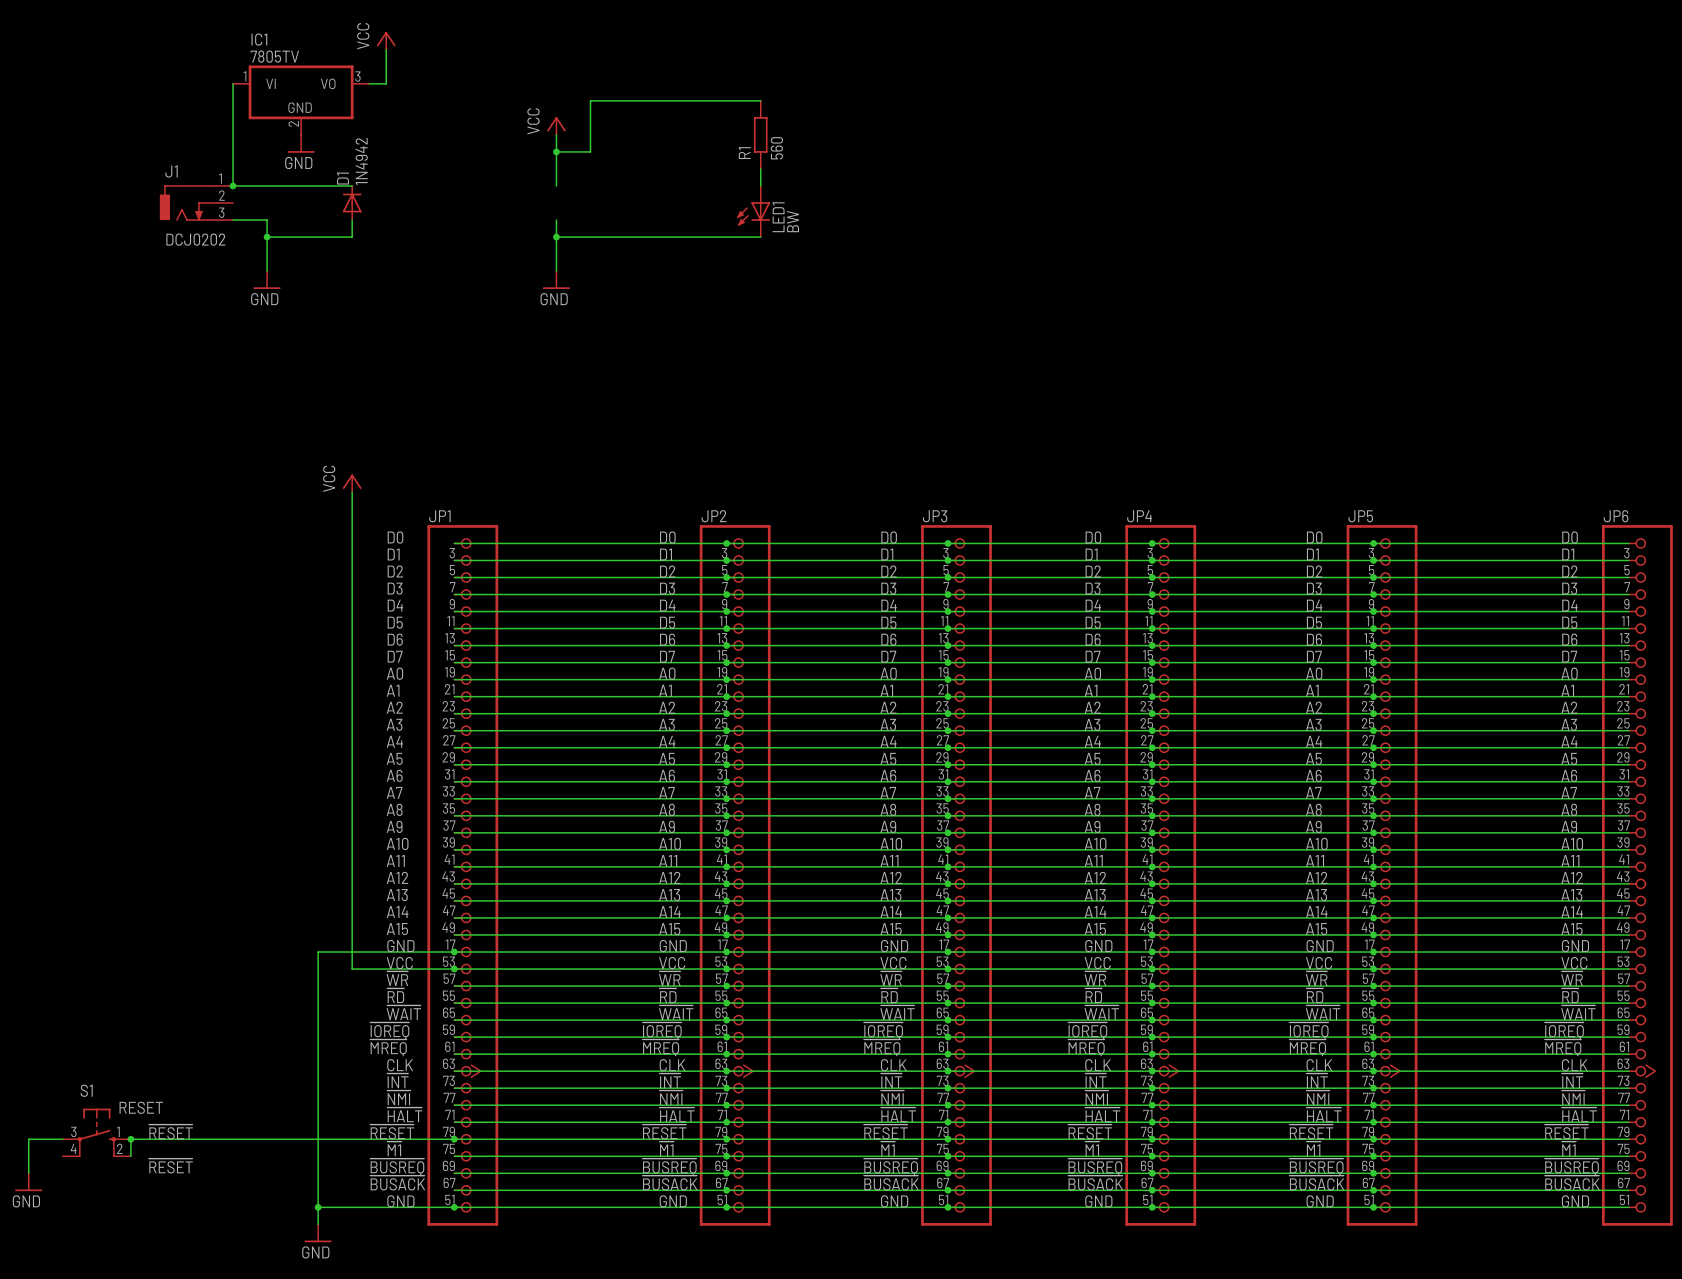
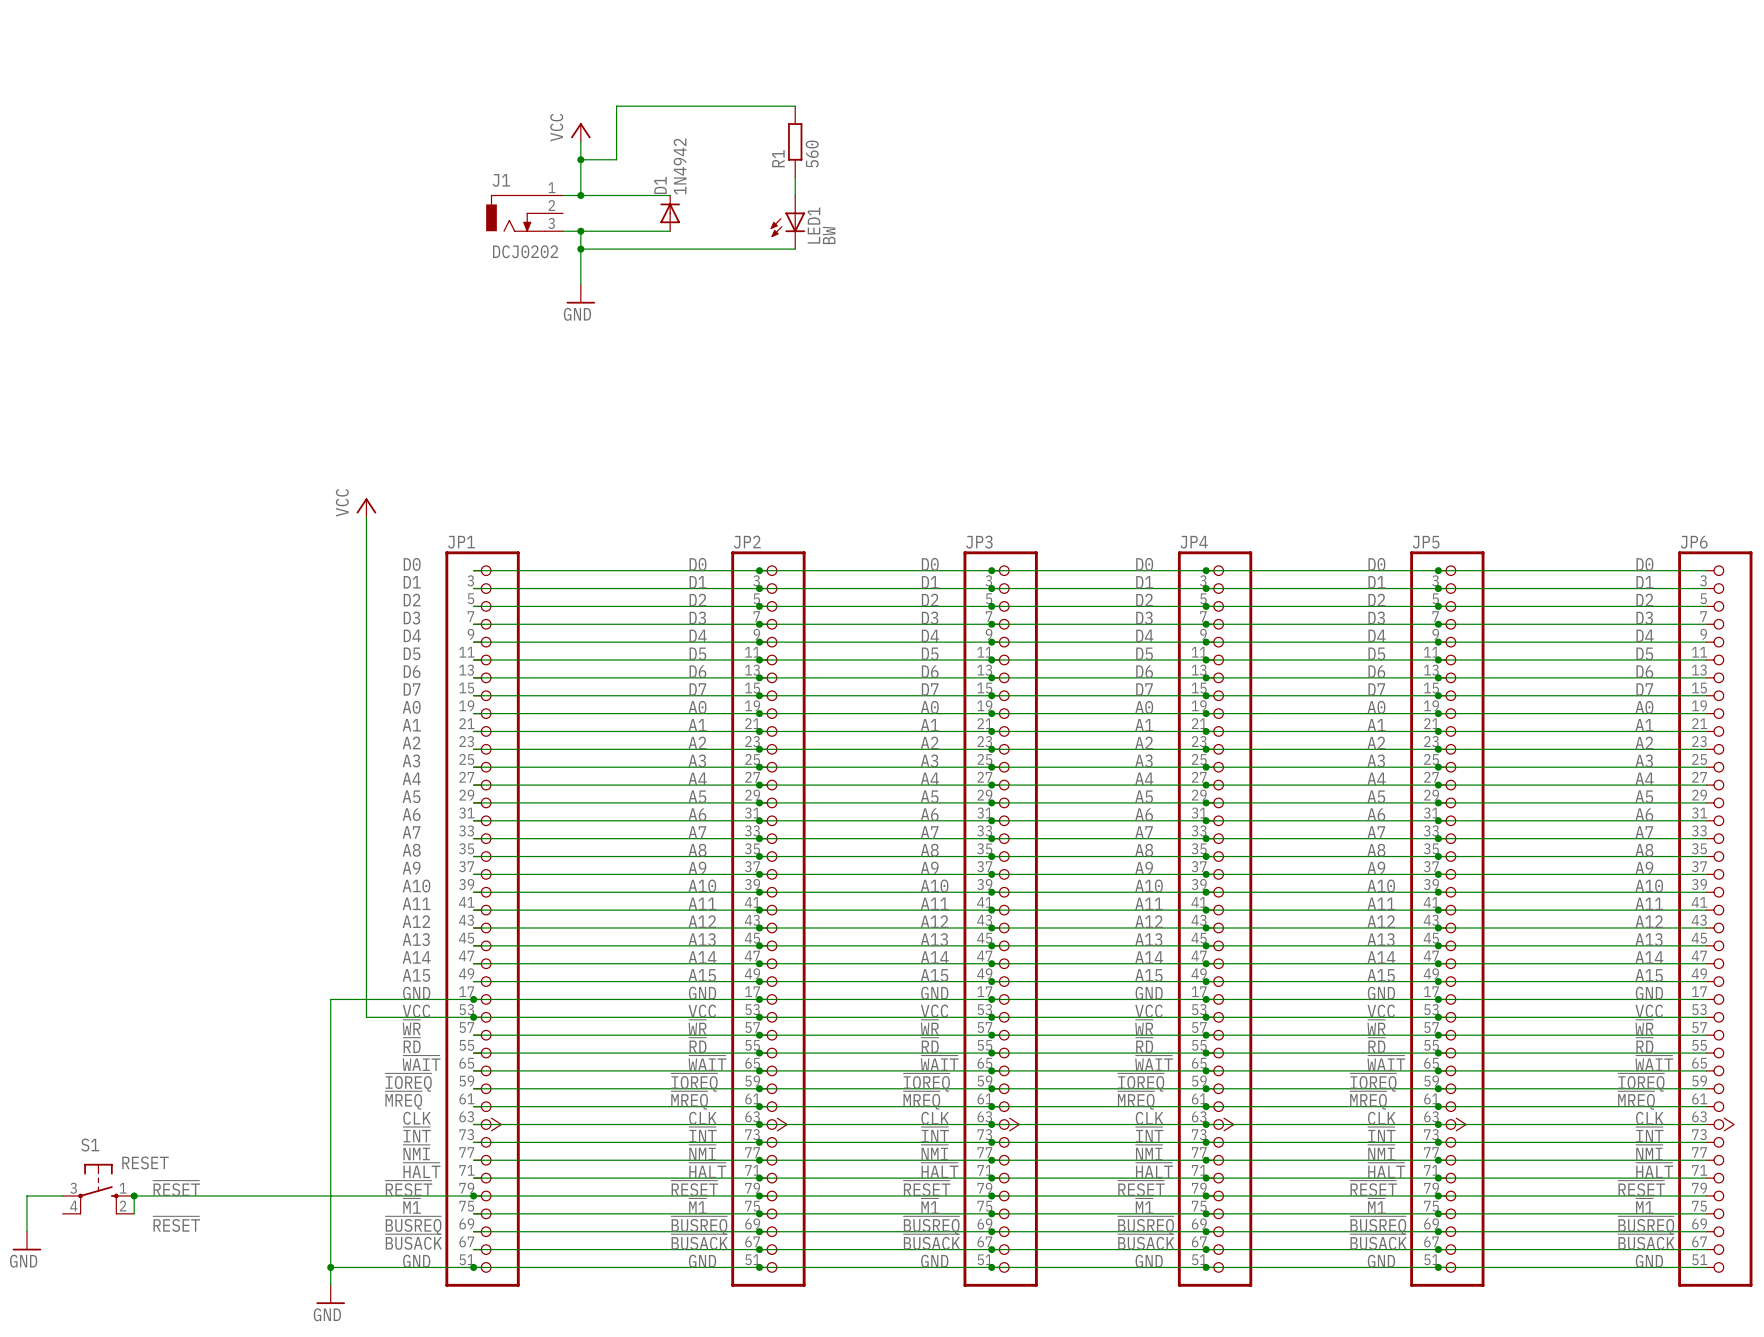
power symbol: VCC (386, 40) -> none
wire: (386, 49) (386, 83) (369, 83) -> none
wire: (233, 83) (233, 185) (352, 185) -> none
IC1: 7805TV (301, 100) -> none
power symbol: GND (301, 143) -> none
junction: (233, 185) -> none
wire: none -> (562, 195) (670, 195)
junction: none -> (580, 195)
J1 position: (196, 203) -> (524, 213)
D1 position: (352, 203) -> (670, 213)
wire: (233, 220) (267, 220) (267, 271) -> none
wire: (352, 220) (352, 237) (267, 237) -> none
wire: none -> (562, 231) (670, 231)
junction: none -> (580, 231)
junction: (267, 237) -> none
power symbol: GND (267, 280) -> none

